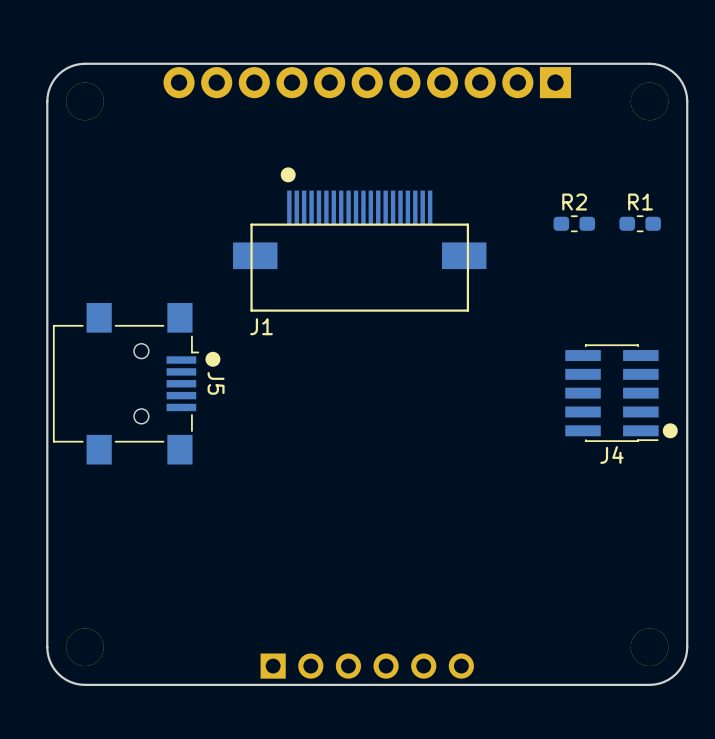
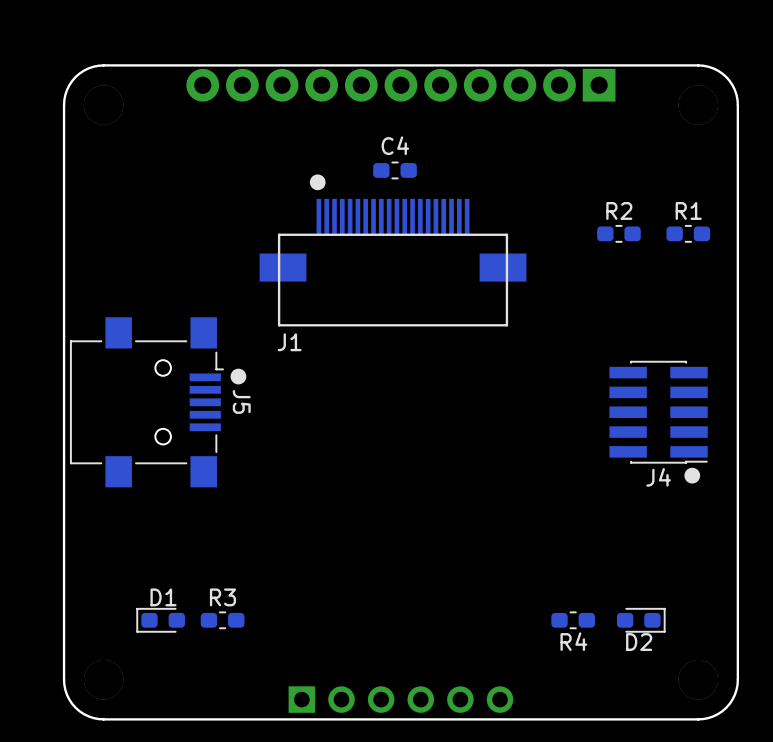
C4: none -> (395, 170)
drawing position: (670, 430) -> (692, 475)
D1: none -> (160, 620)
R3: none -> (222, 620)
R4: none -> (573, 620)
D2: none -> (641, 620)

